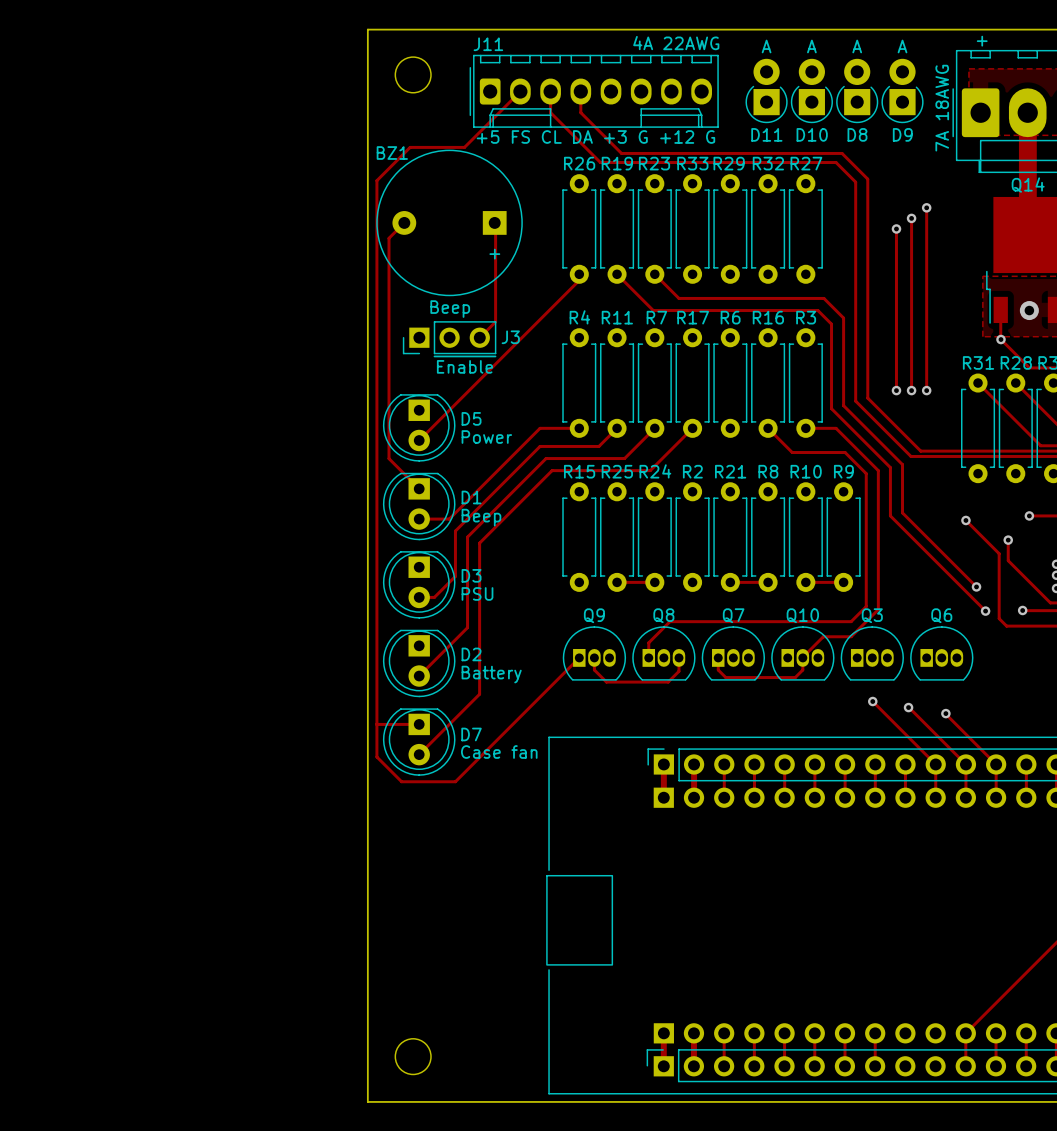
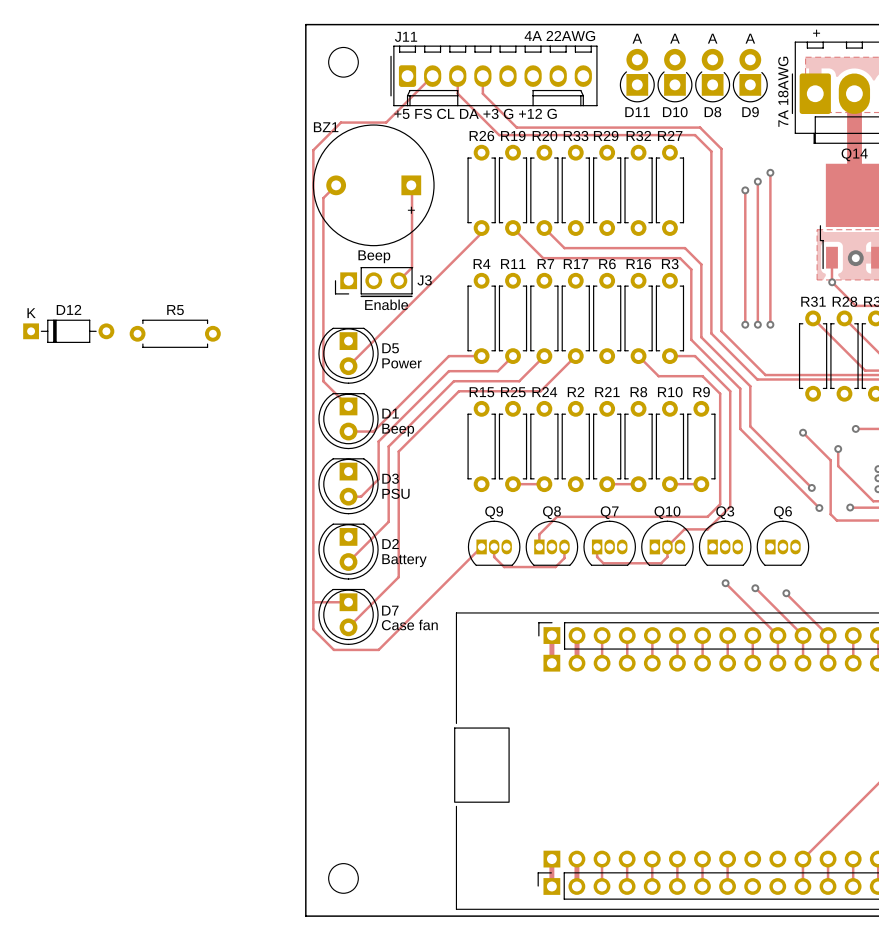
R23 name: R23 (654, 163) -> R20 (544, 135)
D12: none -> (68, 331)
R5: none -> (175, 333)

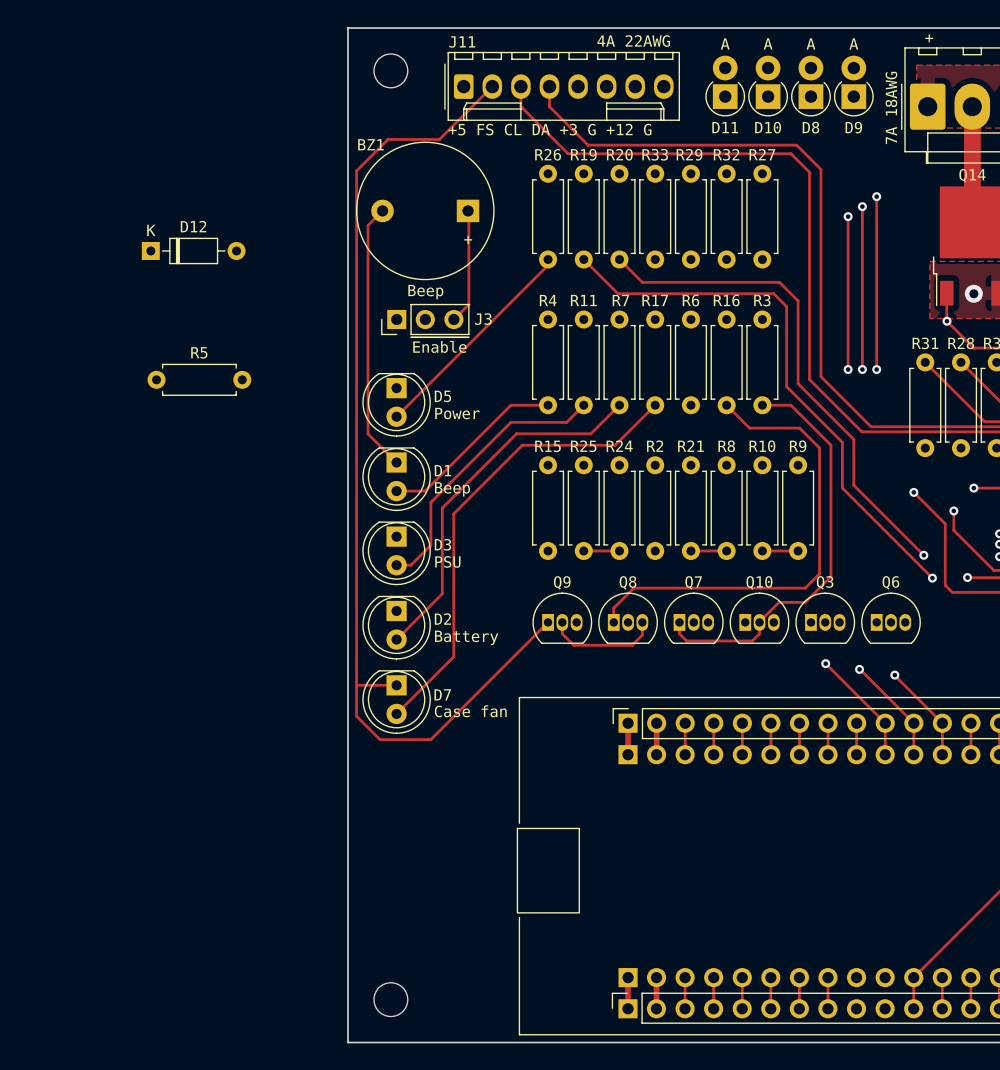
D12 position: (68, 331) -> (193, 250)

